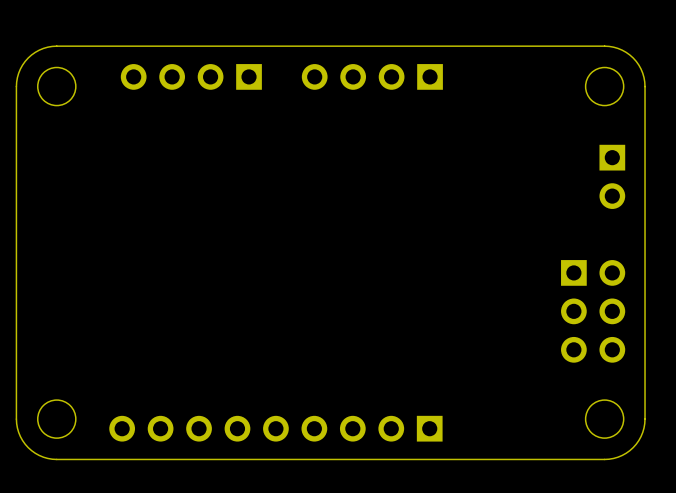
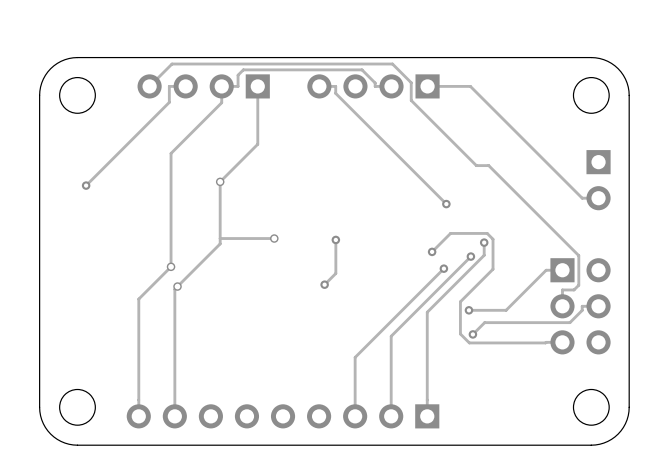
track: none -> (149, 86) (172, 64) (392, 64) (411, 82) (411, 100) (476, 165) (488, 165) (578, 255) (578, 285) (574, 289) (562, 289) (562, 306)
track: none -> (185, 86) (169, 86) (169, 102) (86, 185)
track: none -> (257, 86) (257, 144) (220, 181) (220, 243) (174, 289) (174, 416)
track: none -> (319, 86) (335, 86) (335, 93) (446, 204)
track: none -> (391, 86) (375, 86) (375, 83) (362, 69) (243, 69) (238, 75) (238, 86) (221, 86) (221, 102) (171, 153) (171, 266) (138, 299) (138, 416)
track: none -> (427, 86) (470, 86) (582, 198) (598, 198)
via: none -> (220, 181)
via: none -> (86, 185)
via: none -> (446, 204)
track: none -> (274, 238) (220, 238)
via: none -> (274, 238)
track: none -> (335, 239) (335, 273) (324, 284)
via: none -> (335, 239)
track: none -> (484, 242) (484, 255) (427, 312) (427, 416)
via: none -> (484, 242)
track: none -> (432, 251) (450, 233) (487, 233) (493, 239) (493, 269) (460, 301) (460, 334) (469, 342) (562, 342)
via: none -> (432, 251)
track: none -> (470, 256) (391, 336) (391, 416)
via: none -> (470, 256)
via: none -> (171, 266)
track: none -> (443, 268) (355, 357) (355, 416)
via: none -> (443, 268)
track: none -> (562, 270) (546, 270) (506, 310) (468, 310)
via: none -> (324, 284)
via: none -> (177, 286)
track: none -> (598, 306) (582, 306) (582, 310) (569, 322) (484, 322) (472, 334)
via: none -> (468, 310)
via: none -> (472, 334)

